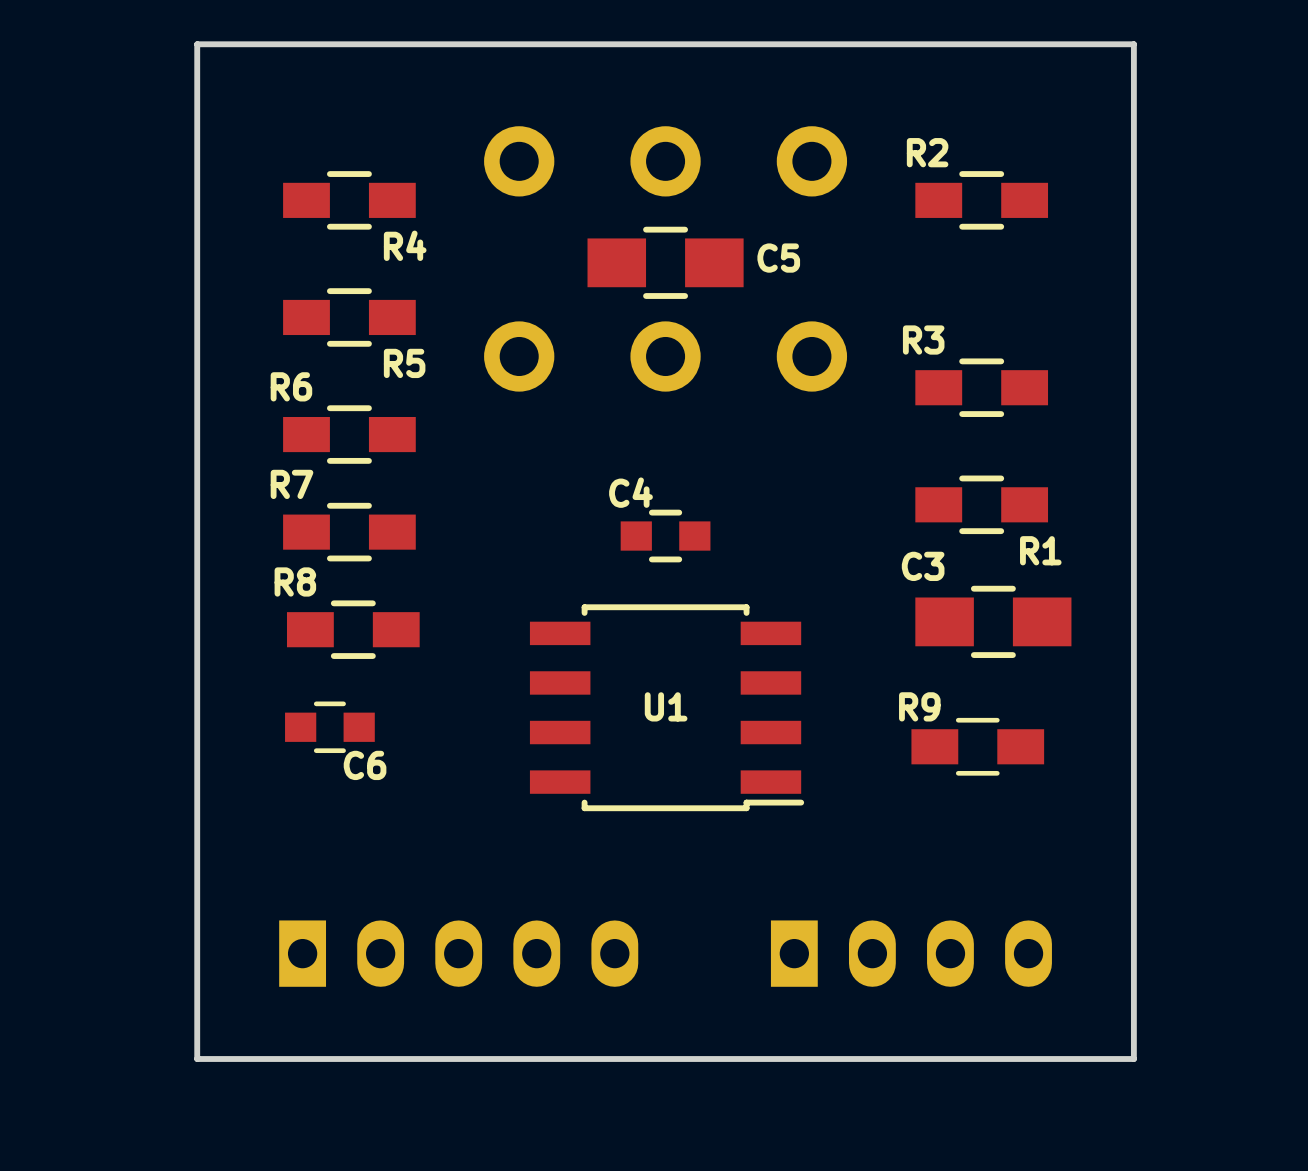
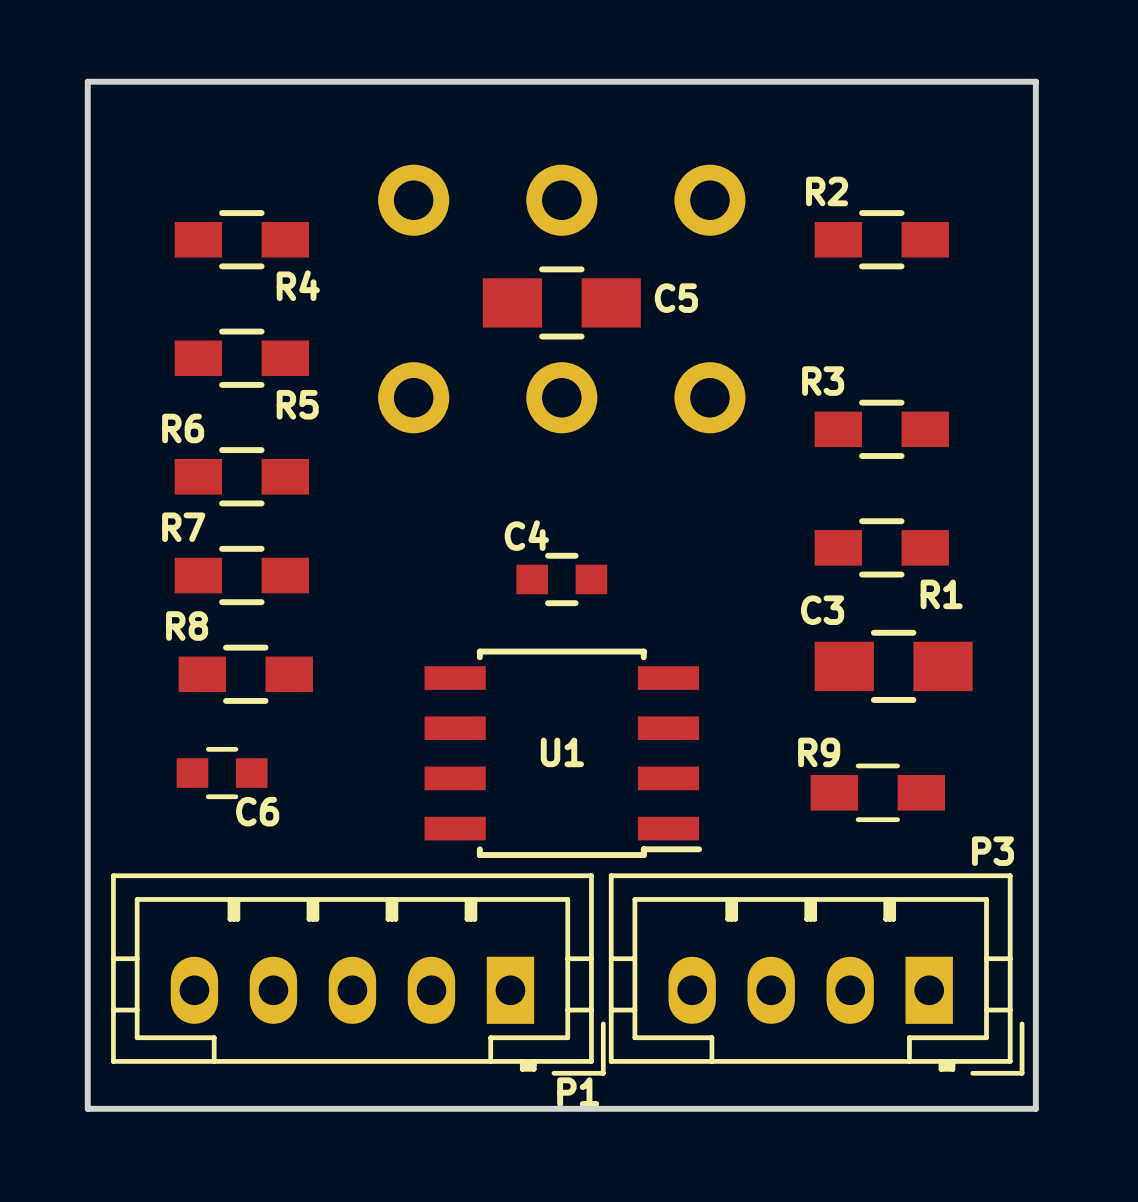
P1 side: bottom (458, 953) -> top (358, 974)
P3 side: bottom (911, 953) -> top (816, 974)

